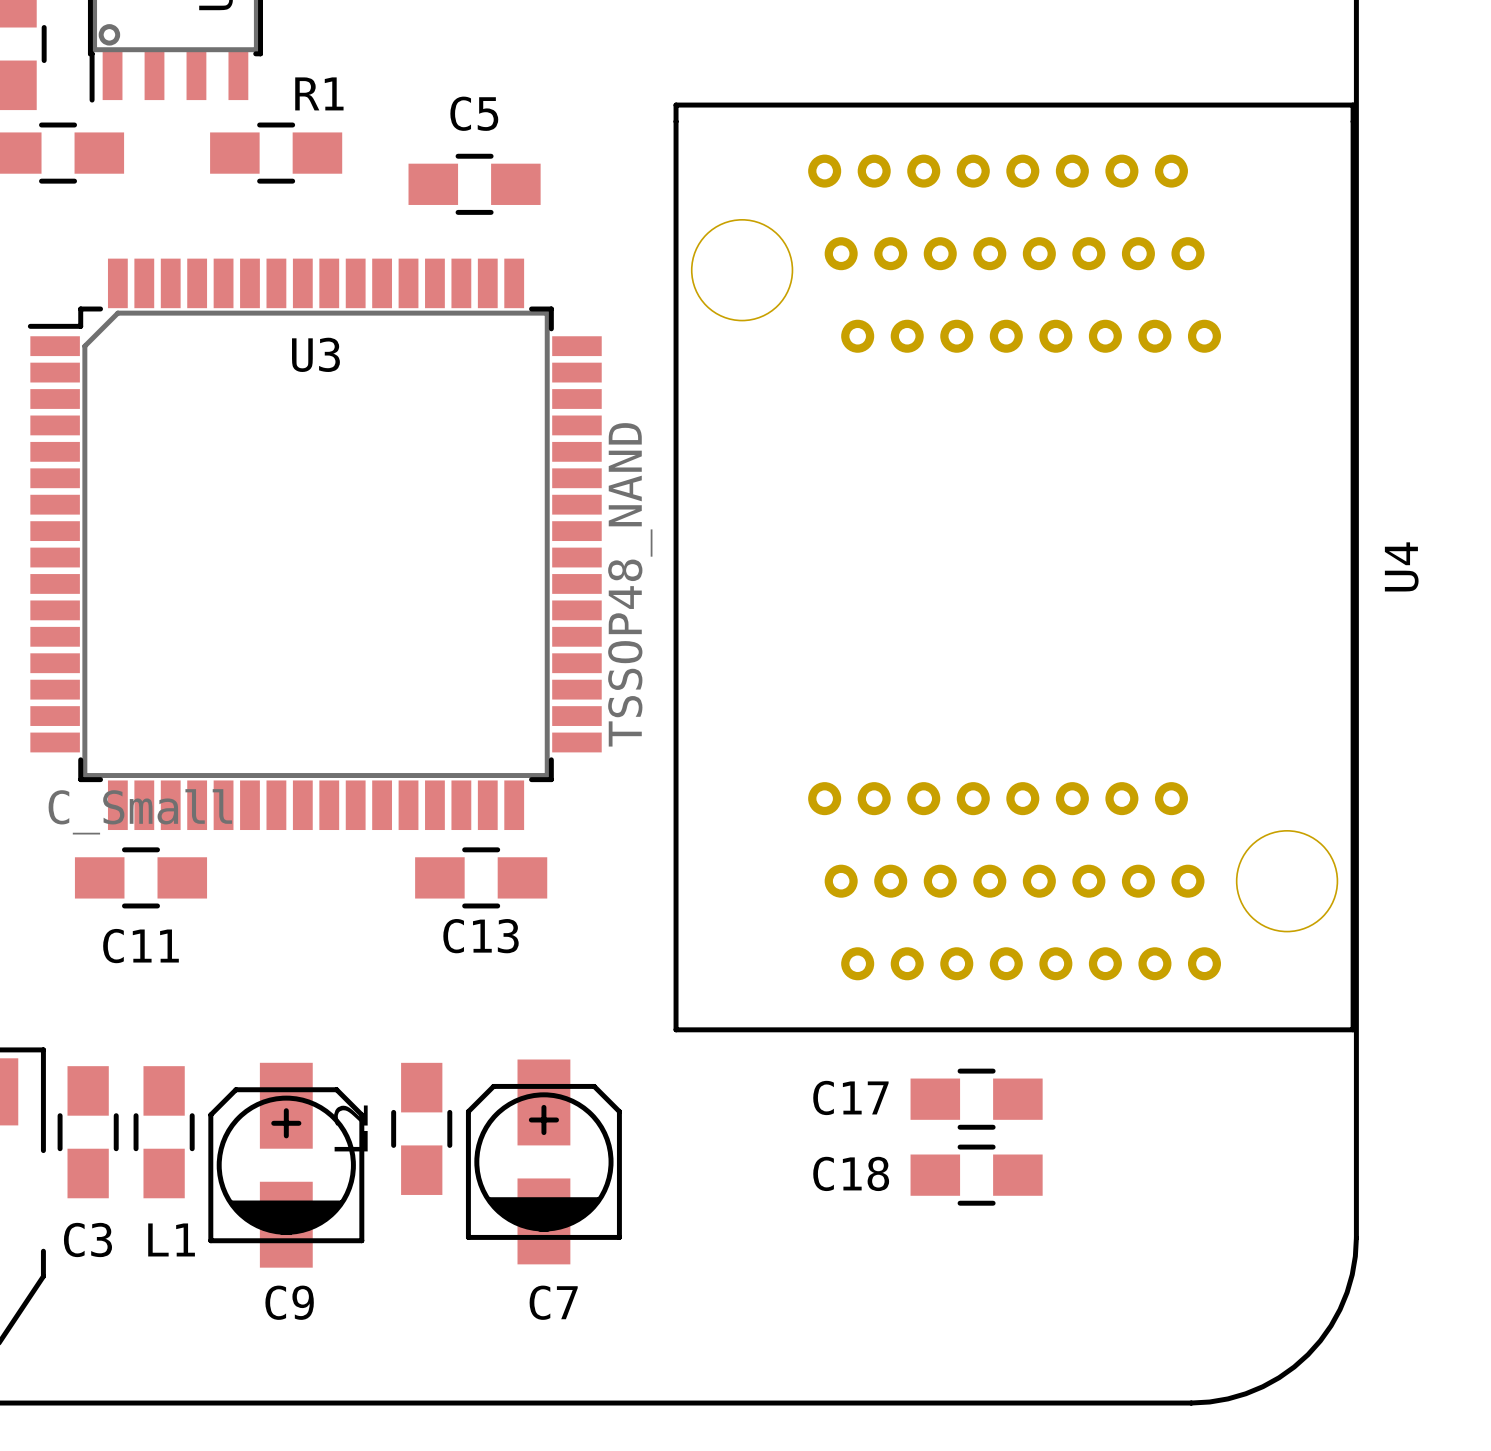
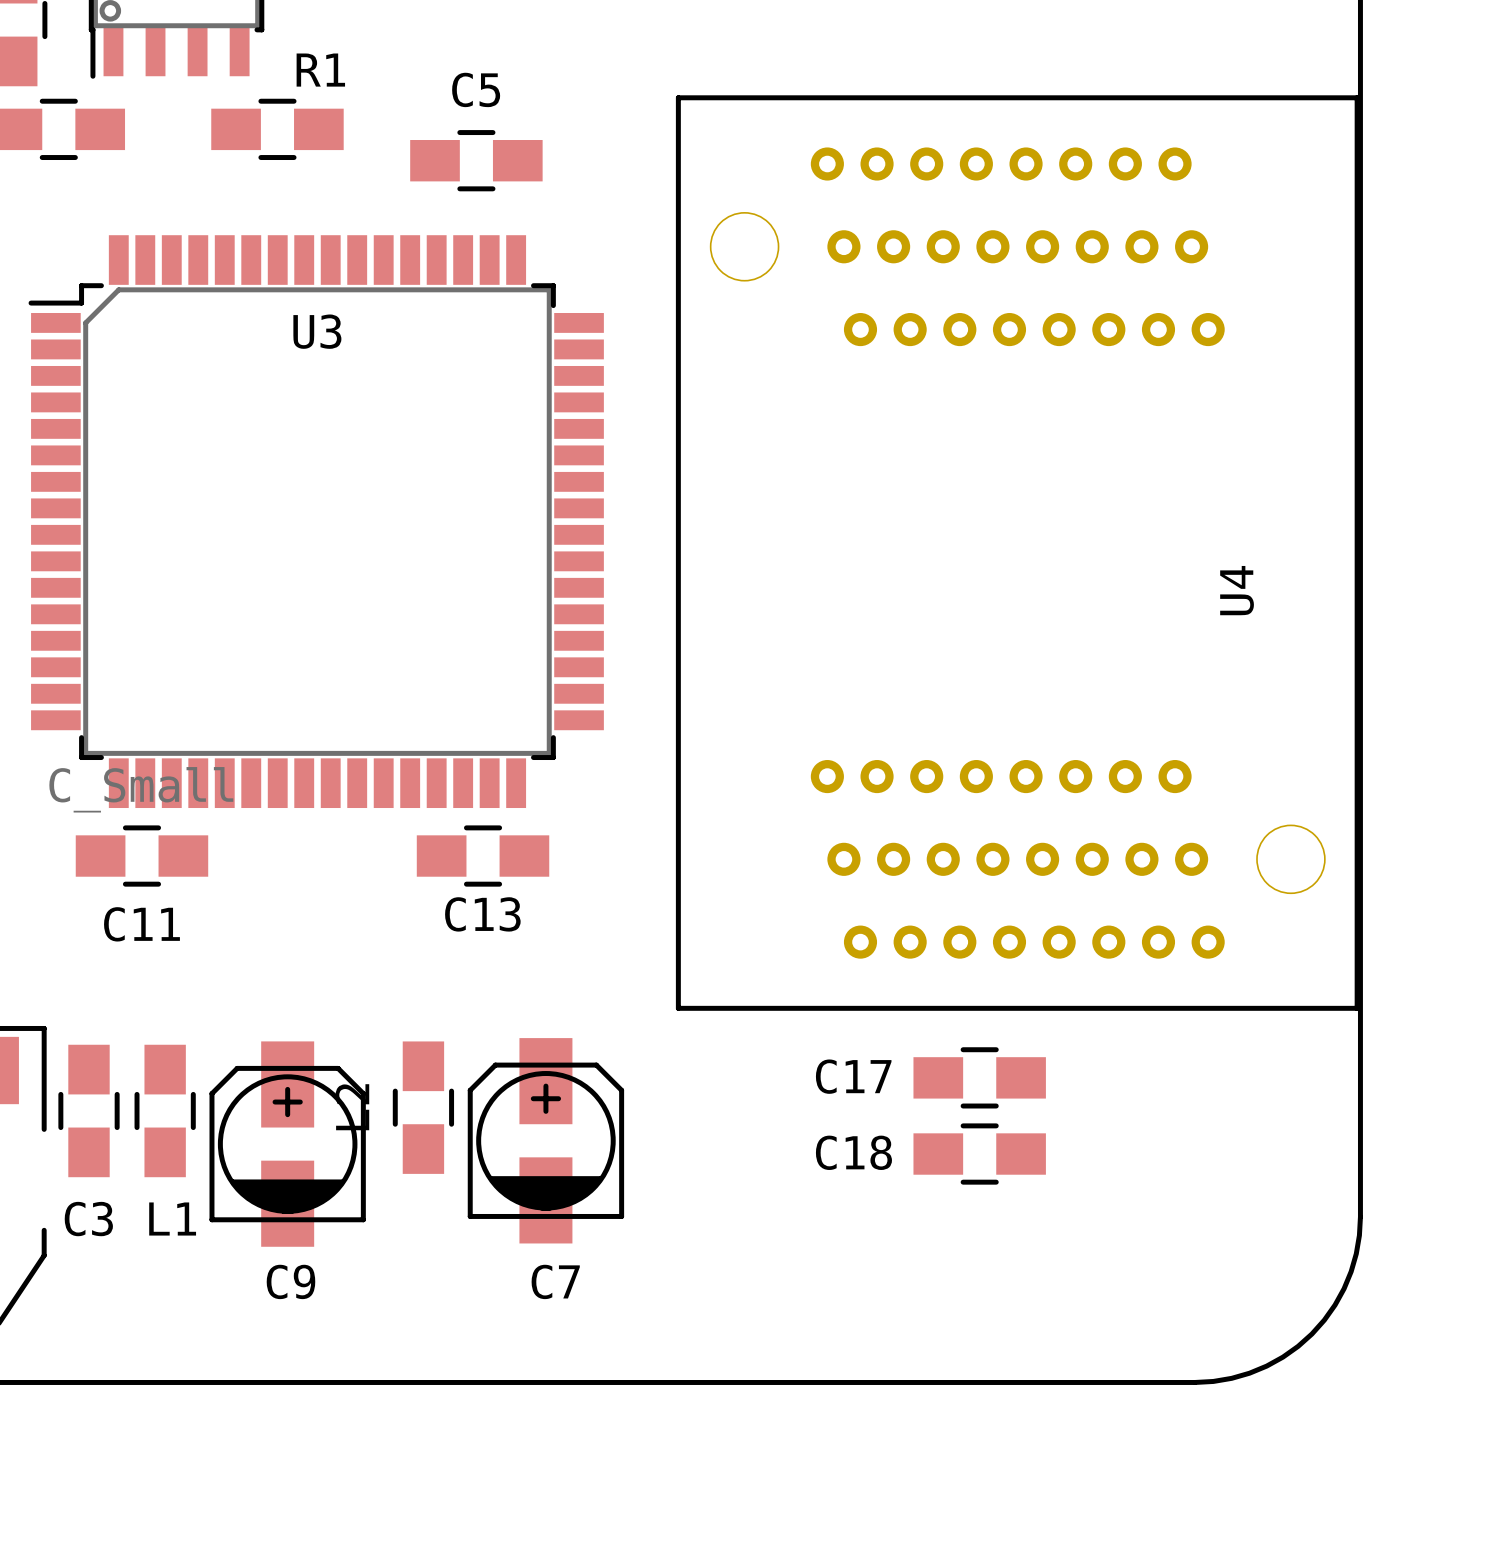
U4 footprint: [673, 102, 1356, 1033] -> [675, 95, 1360, 1011]
U4 name position: U4 (1401, 566) -> U4 (1237, 590)
U4 value: TSSOP48_NAND (630, 584) -> none

